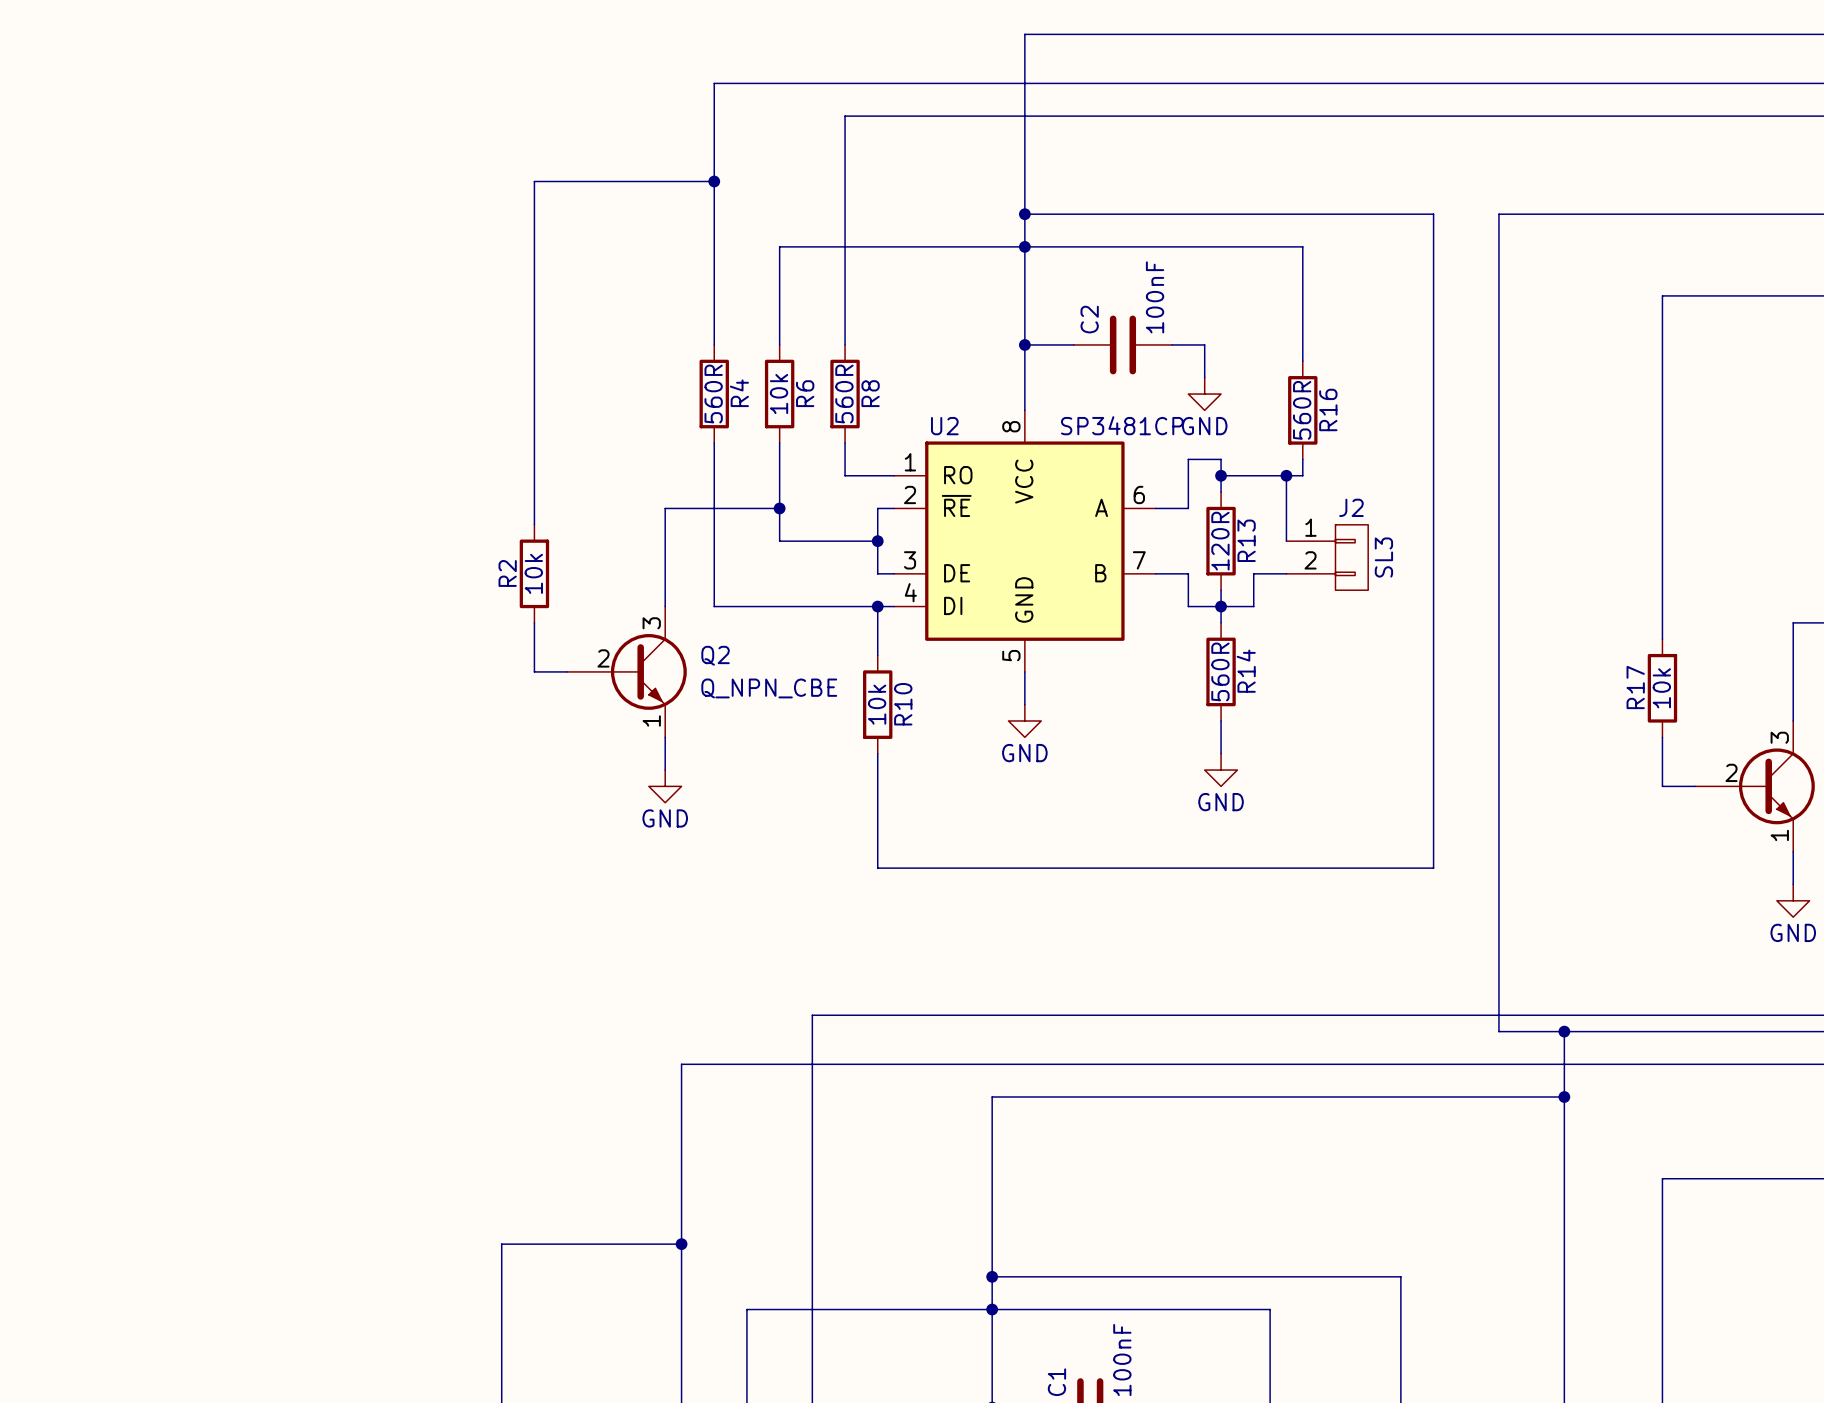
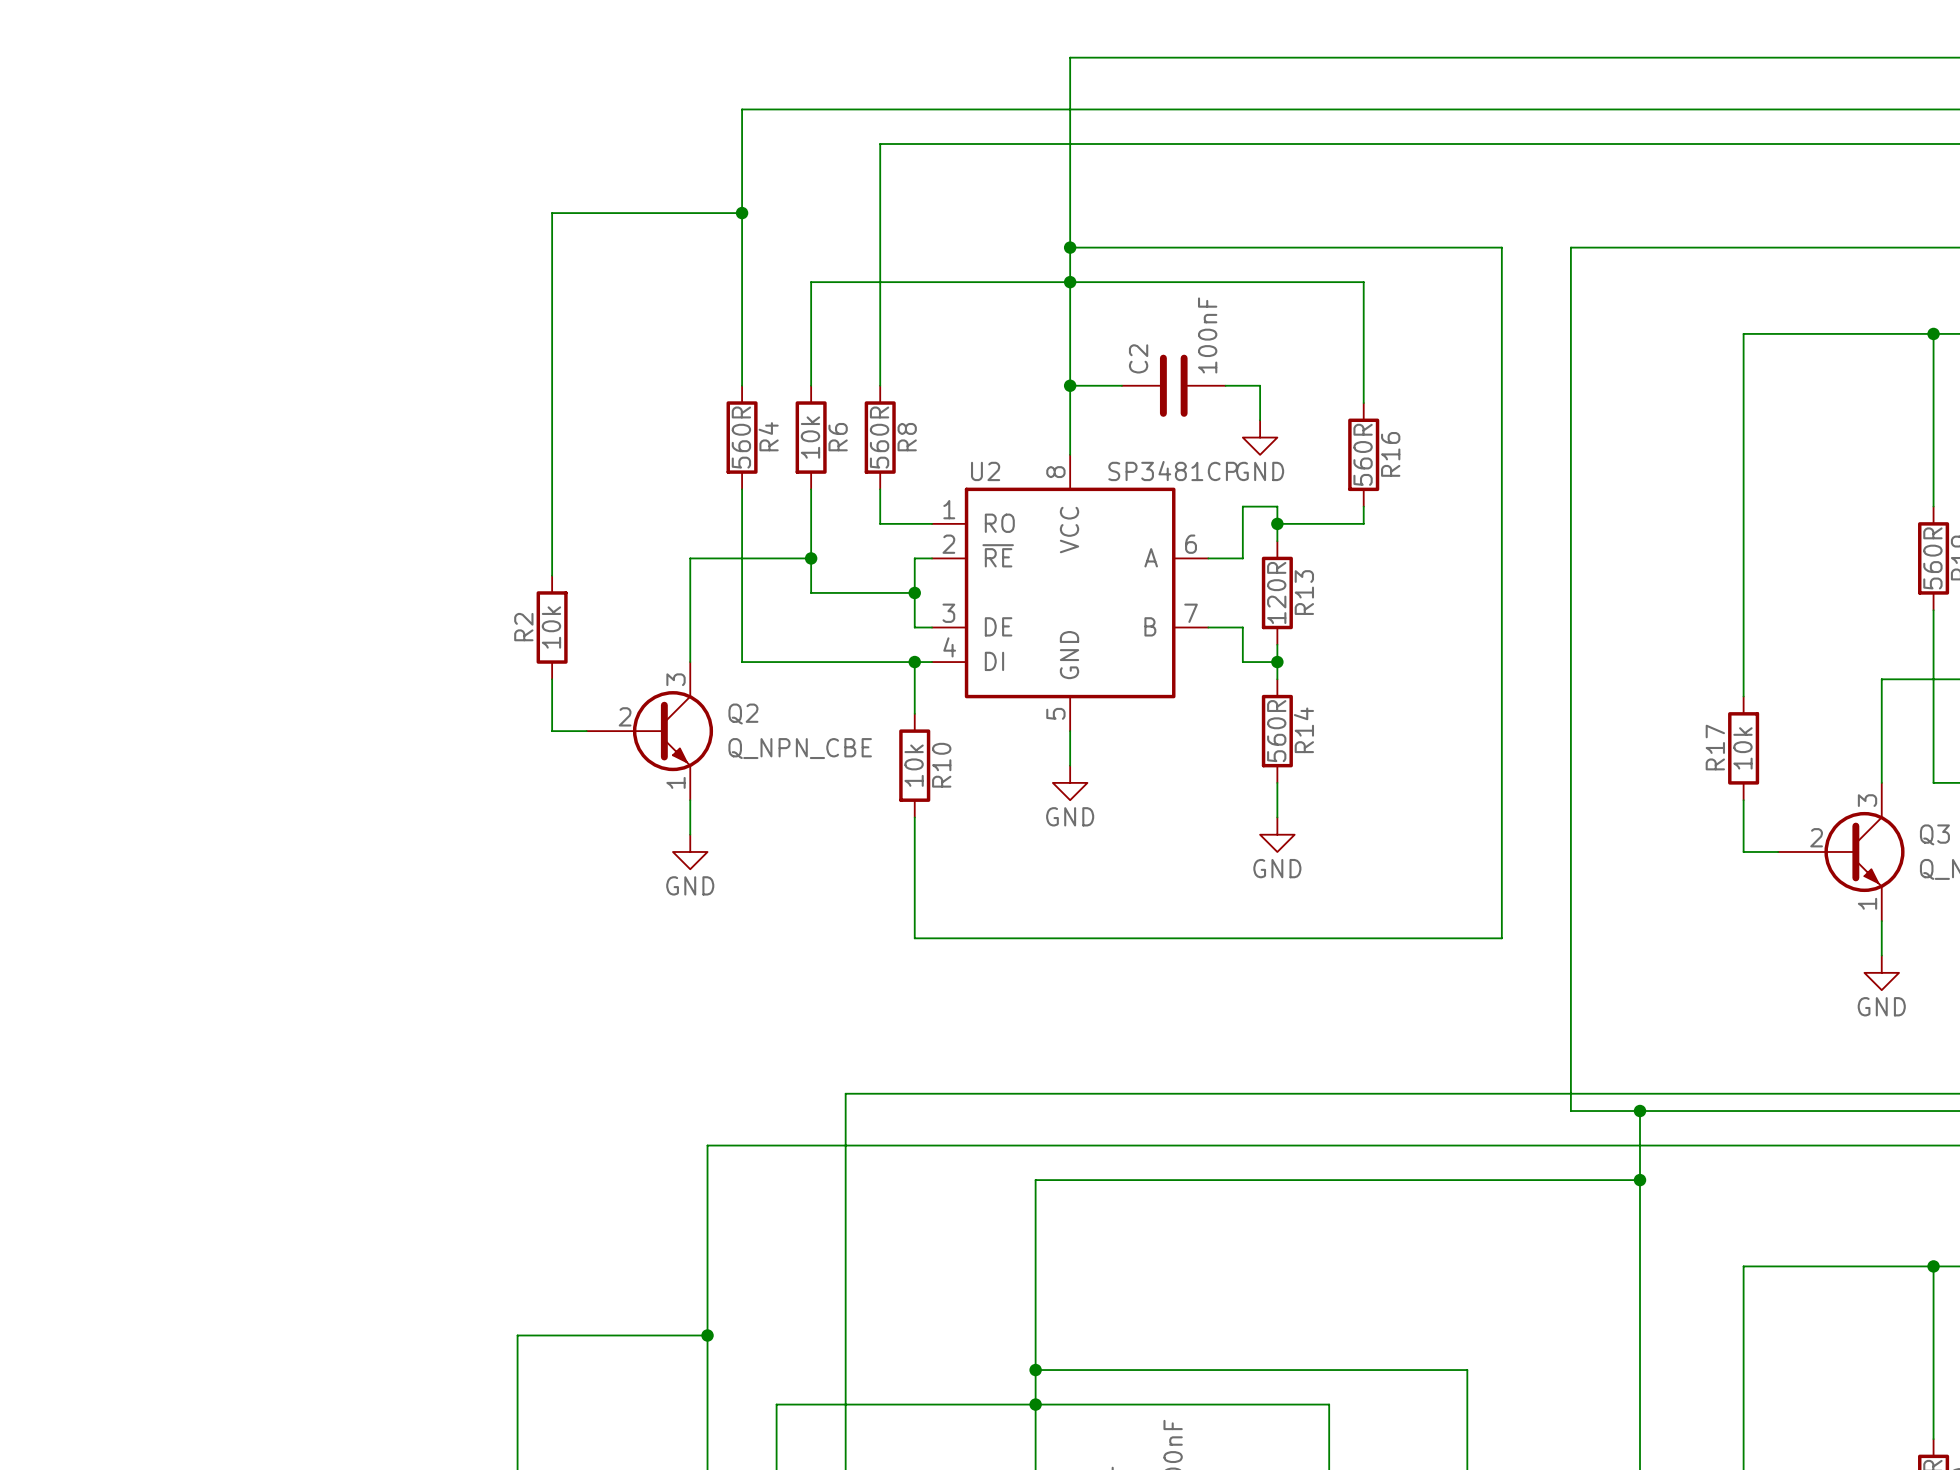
wire: (1286, 475) (1286, 541) -> none
junction: (1286, 475) -> none
J2: SL3 (1327, 557) -> none
wire: (1286, 573) (1253, 573) (1253, 606) (1221, 606) -> none

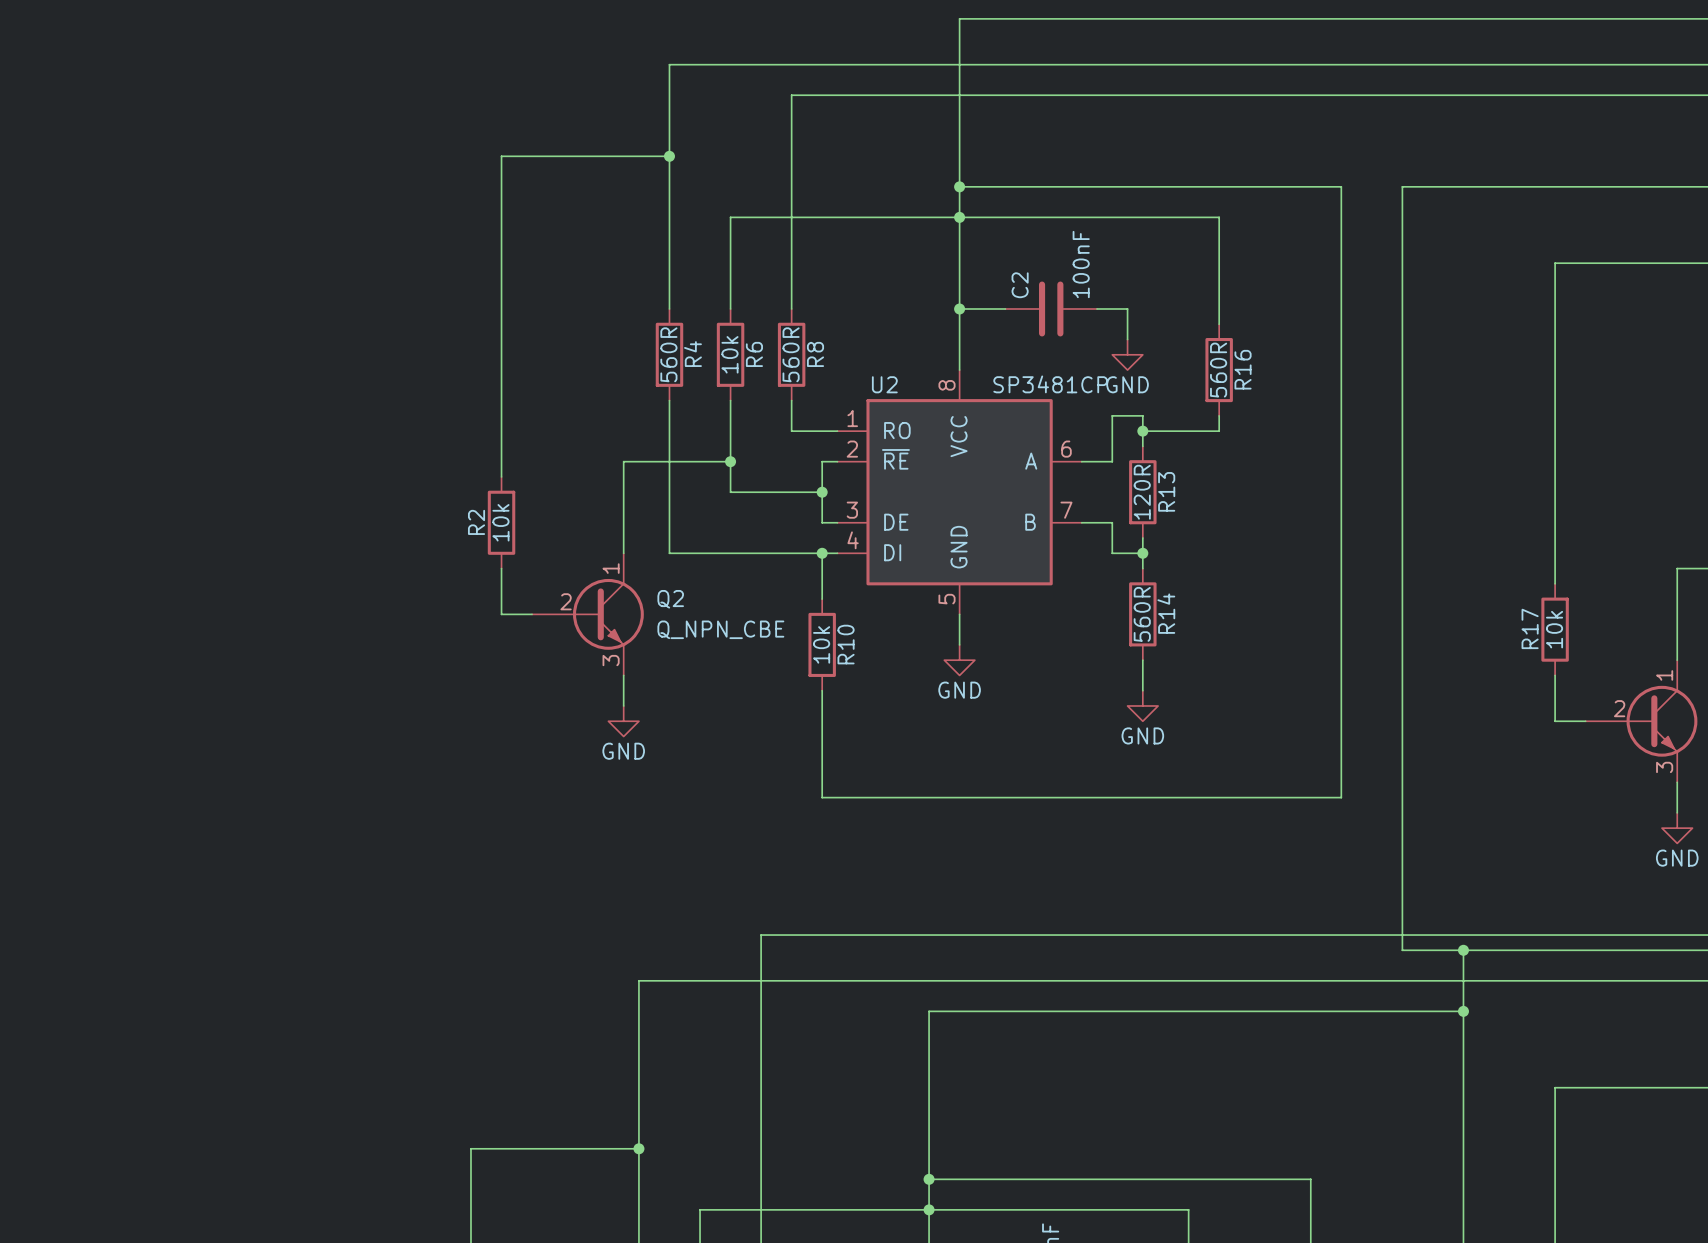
Q2 pin number: 3 (676, 679) -> 1 (611, 568)
Q2 pin number: 1 (676, 782) -> 3 (611, 660)
Q3 pin number: 3 (1867, 800) -> 1 (1664, 675)
Q3 pin number: 1 (1867, 903) -> 3 (1664, 767)

